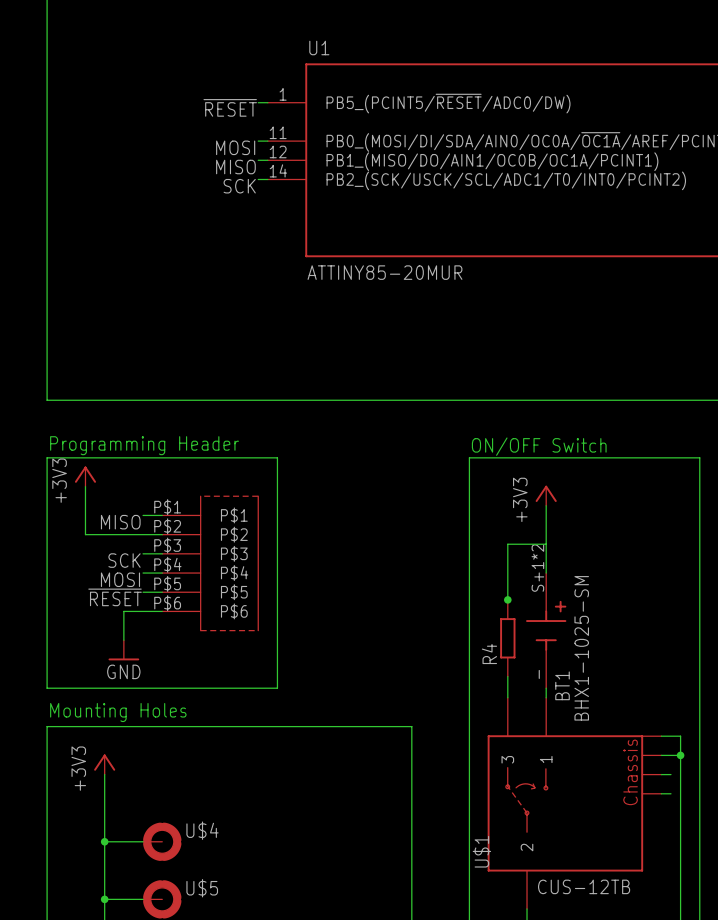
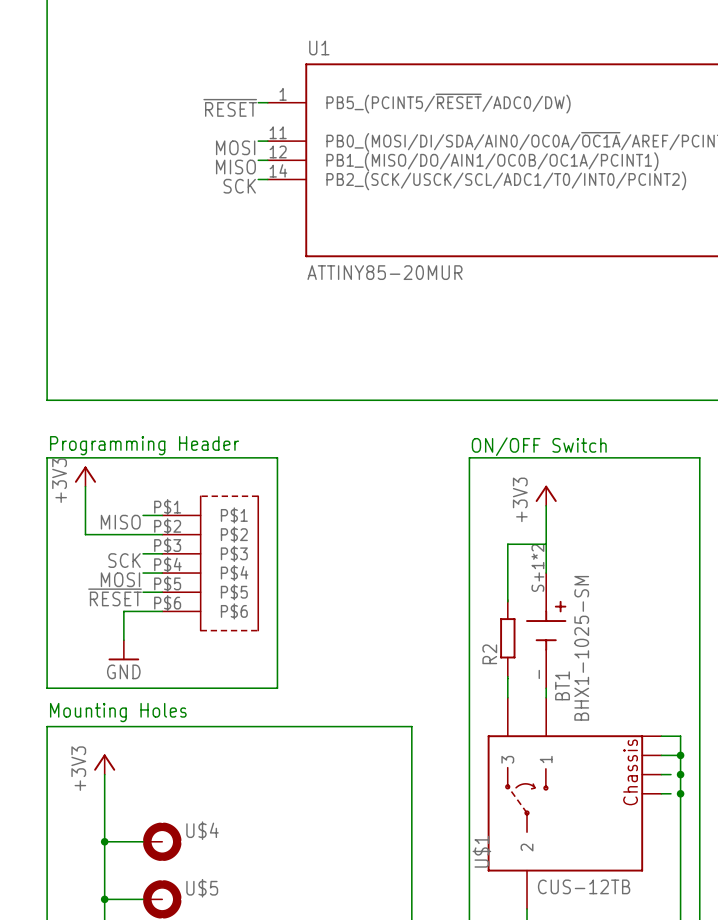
junction: (507, 599) -> none
R4 name: R4 (489, 654) -> R2 (489, 654)
junction: none -> (680, 774)
junction: none -> (680, 793)

